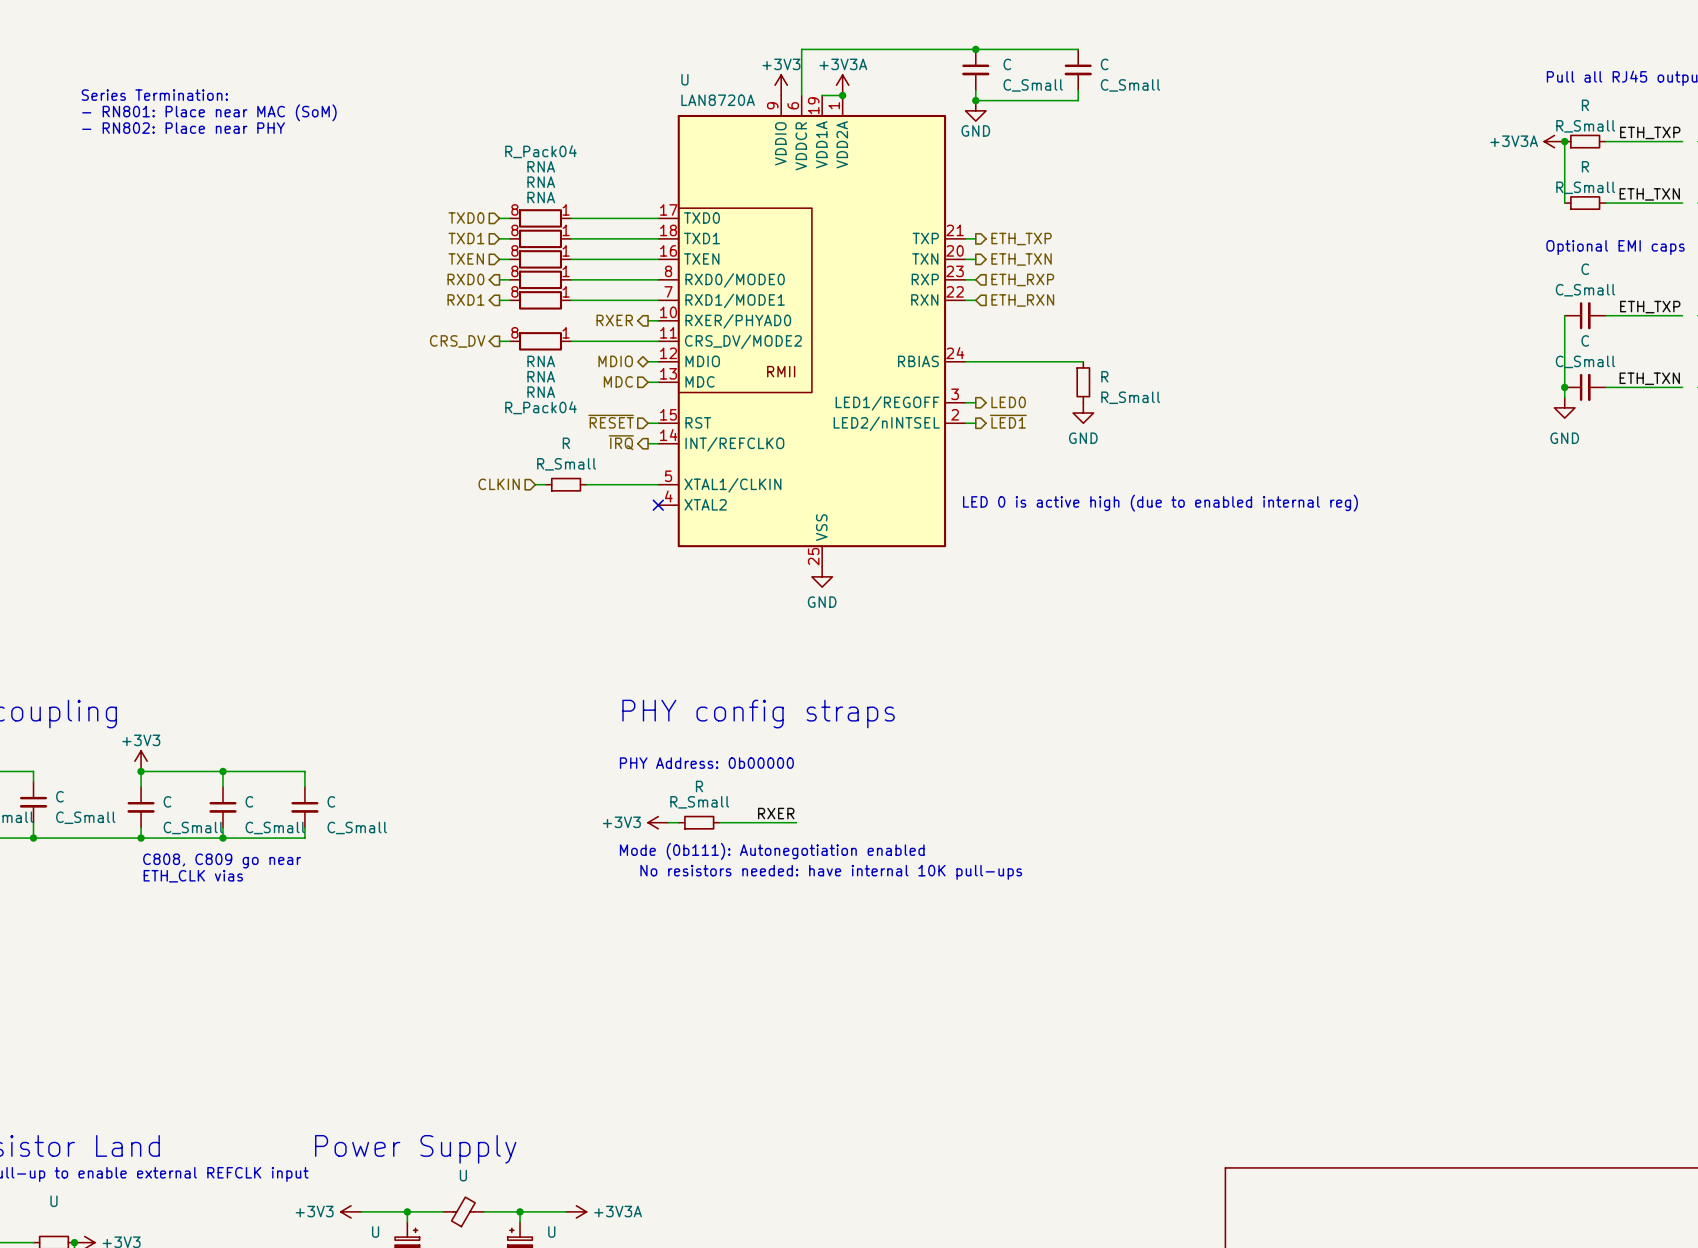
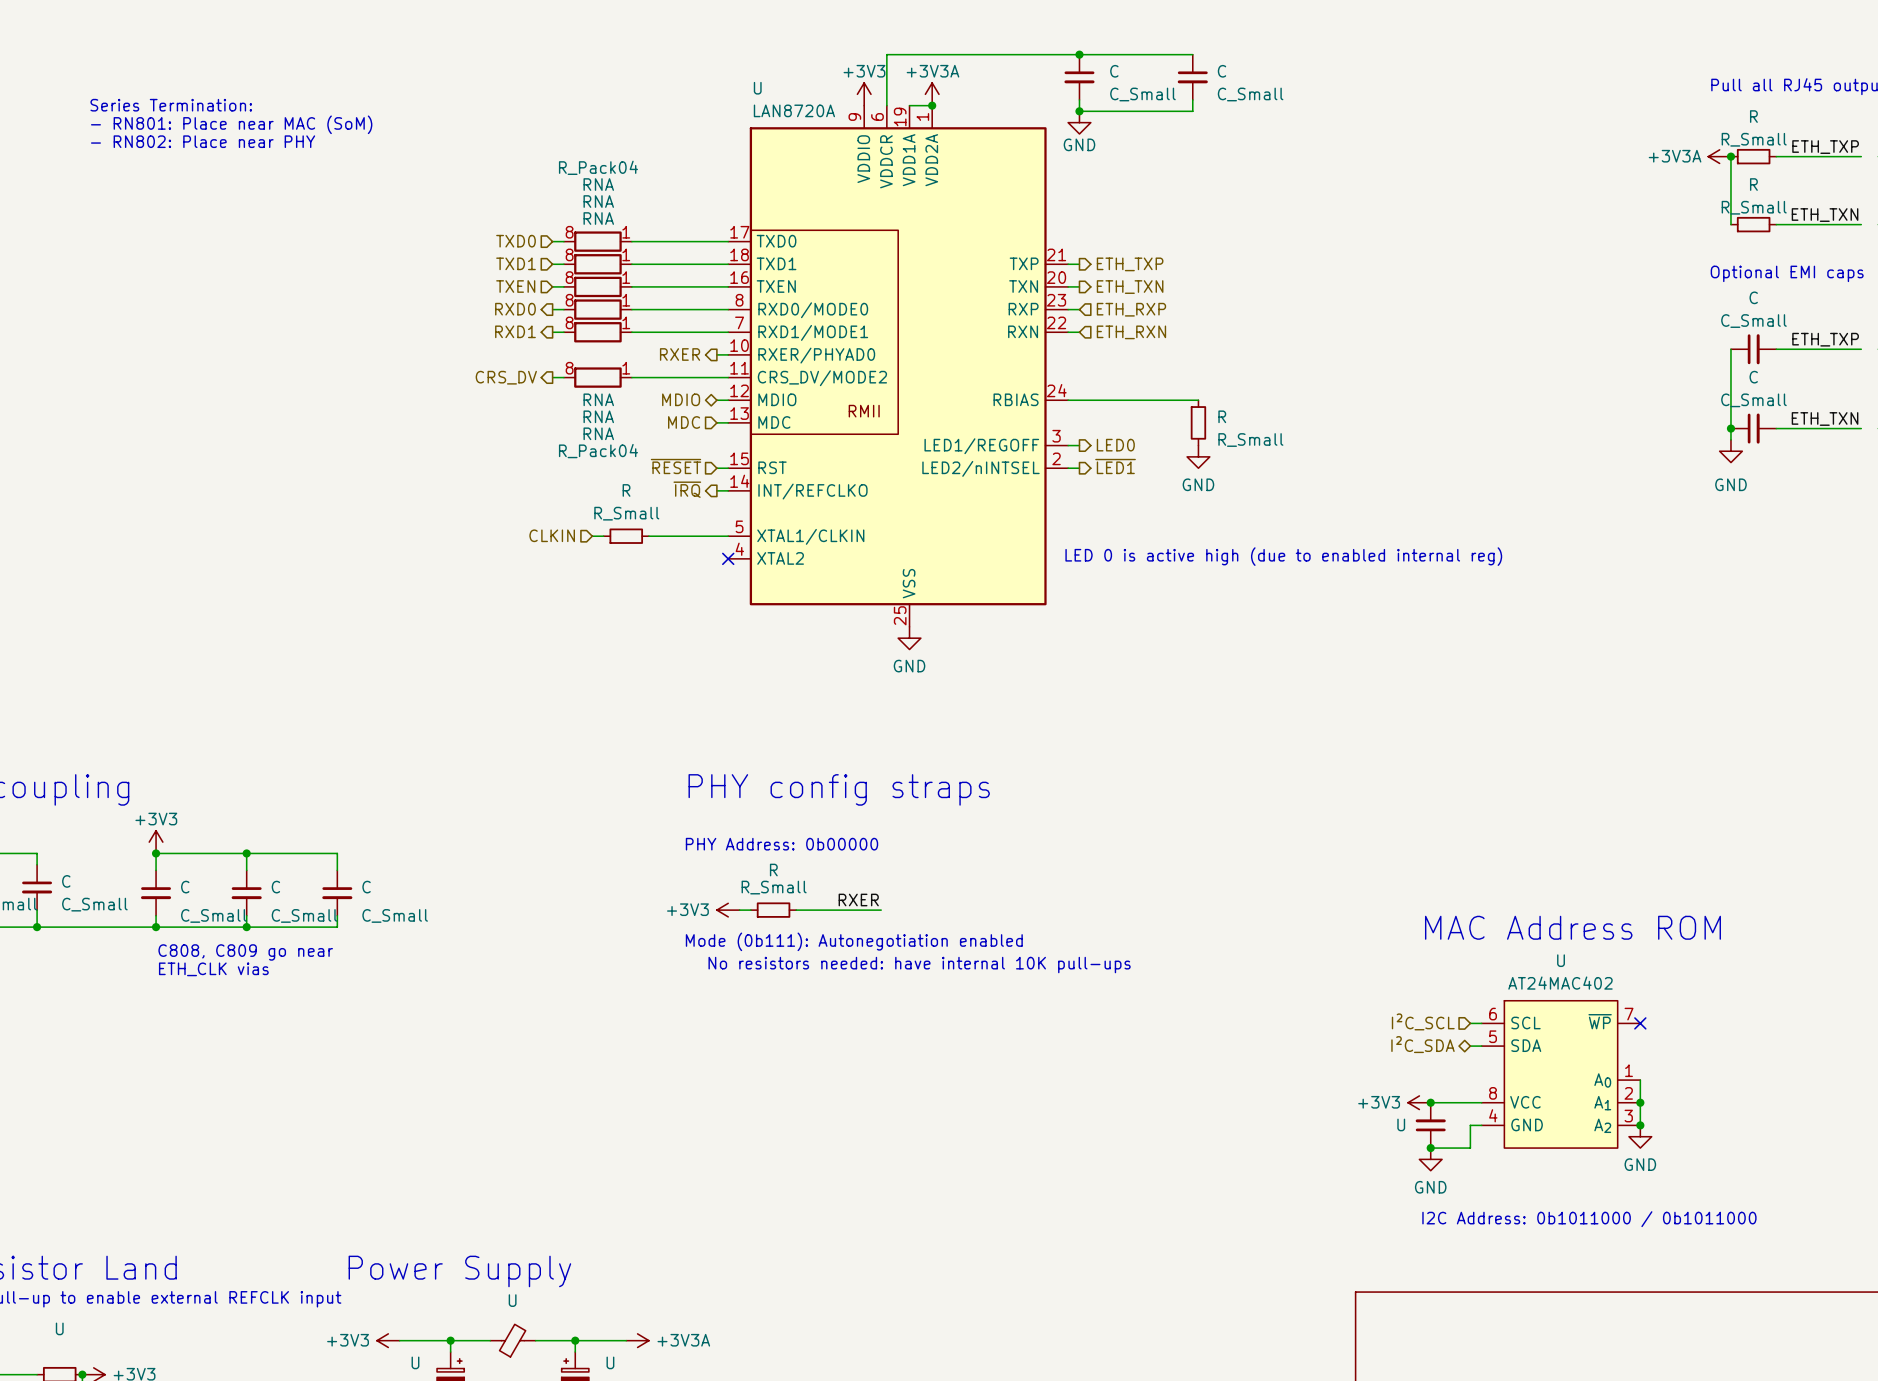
text: none -> MAC Address ROM (1572, 927)
hierarchical label: none -> I²C_SCL (1423, 1021)
wire: none -> (1470, 1023) (1481, 1023)
no-connect mark: none -> (1640, 1023)
hierarchical label: none -> I²C_SDA (1422, 1044)
wire: none -> (1470, 1046) (1481, 1046)
U: none -> AT24MAC402 (1561, 1074)
wire: none -> (1640, 1080) (1640, 1125)
power symbol: none -> +3V3 (1419, 1102)
wire: none -> (1430, 1102) (1481, 1102)
junction: none -> (1430, 1102)
junction: none -> (1640, 1102)
U: none -> (1430, 1125)
wire: none -> (1481, 1125) (1470, 1125) (1470, 1148) (1430, 1148)
junction: none -> (1640, 1125)
power symbol: none -> GND (1640, 1136)
junction: none -> (1430, 1148)
power symbol: none -> GND (1430, 1159)
text: none -> I2C Address: 0b1011000 / 0b1011000 (1589, 1219)

